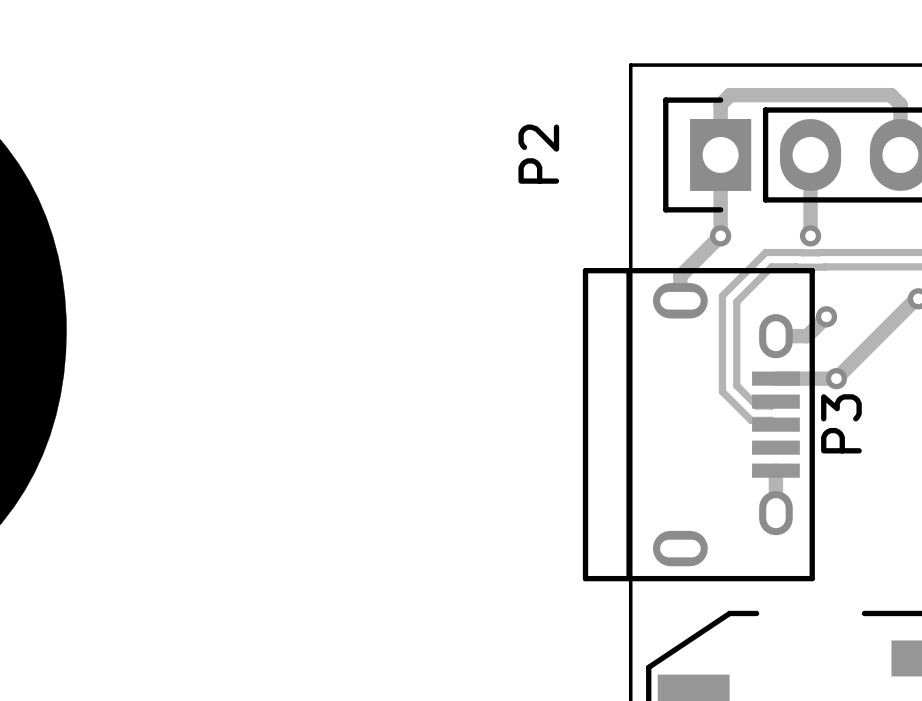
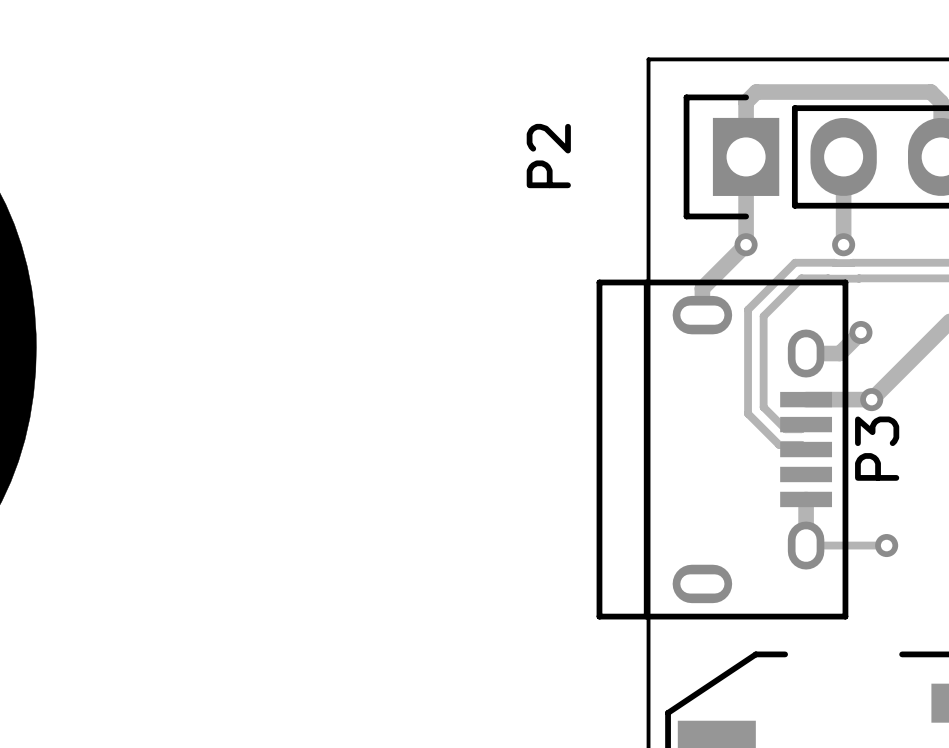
track: none -> (806, 545) (886, 545)
via: none -> (886, 545)

